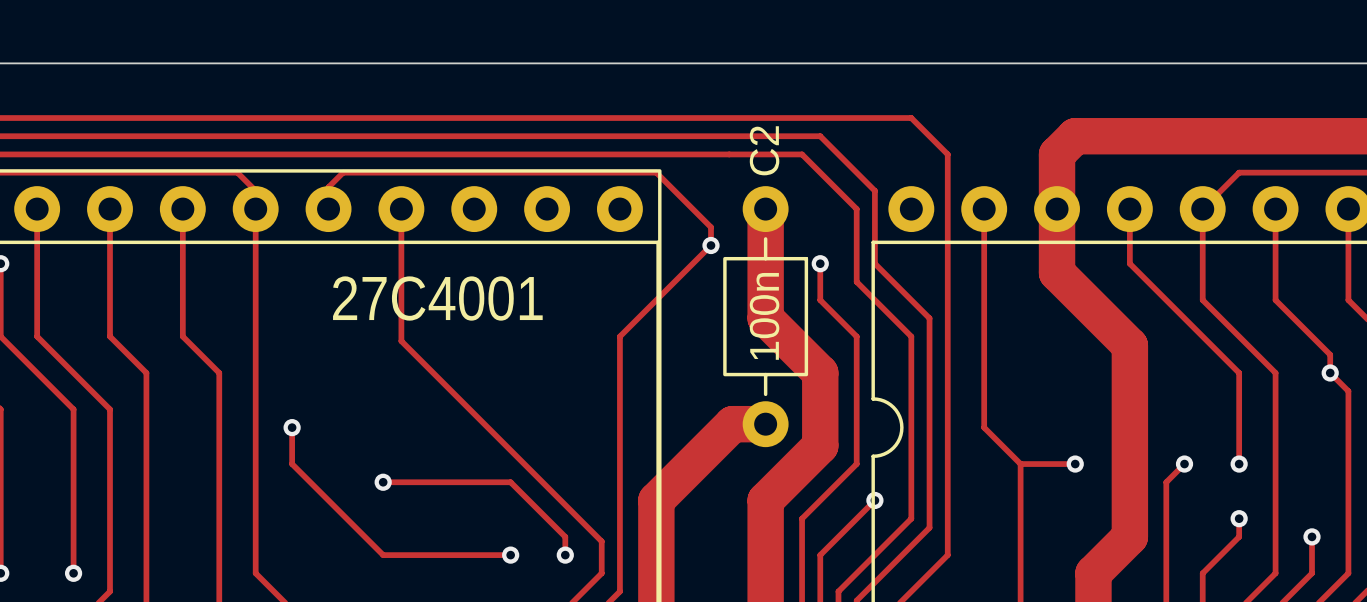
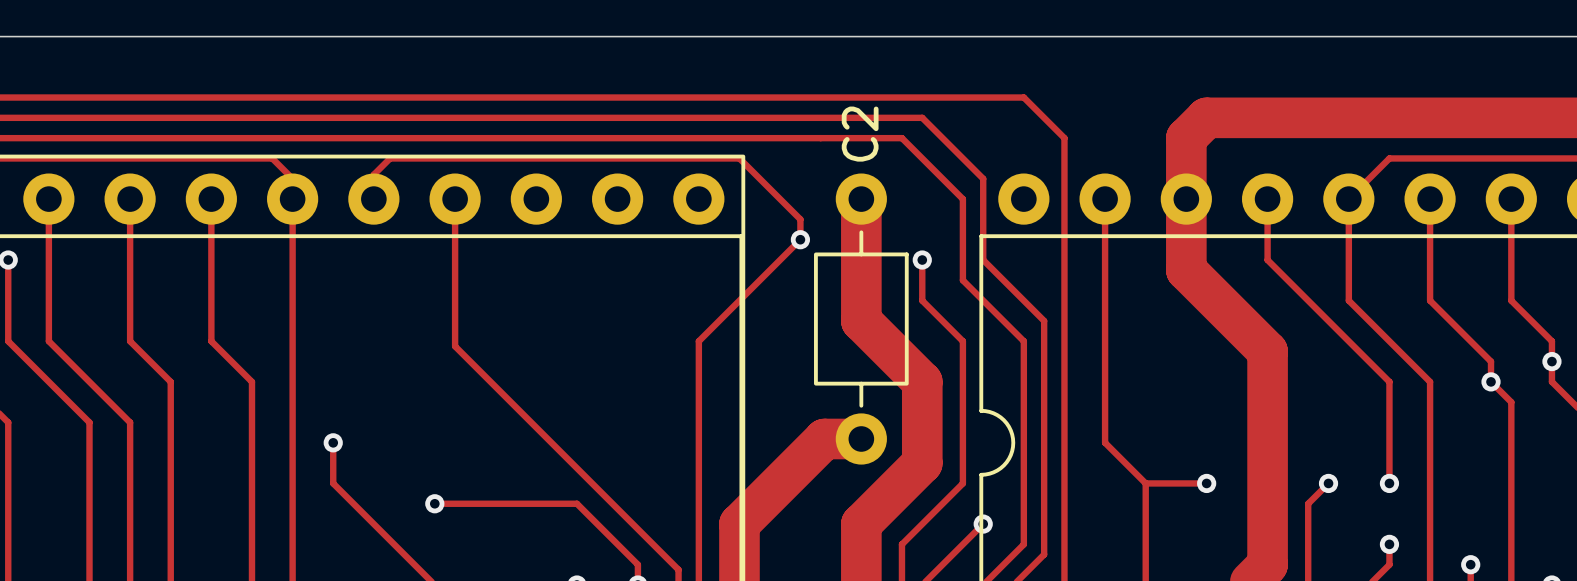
part value: 27C4001 (437, 298) -> none
C2 value: 100n (764, 316) -> none

